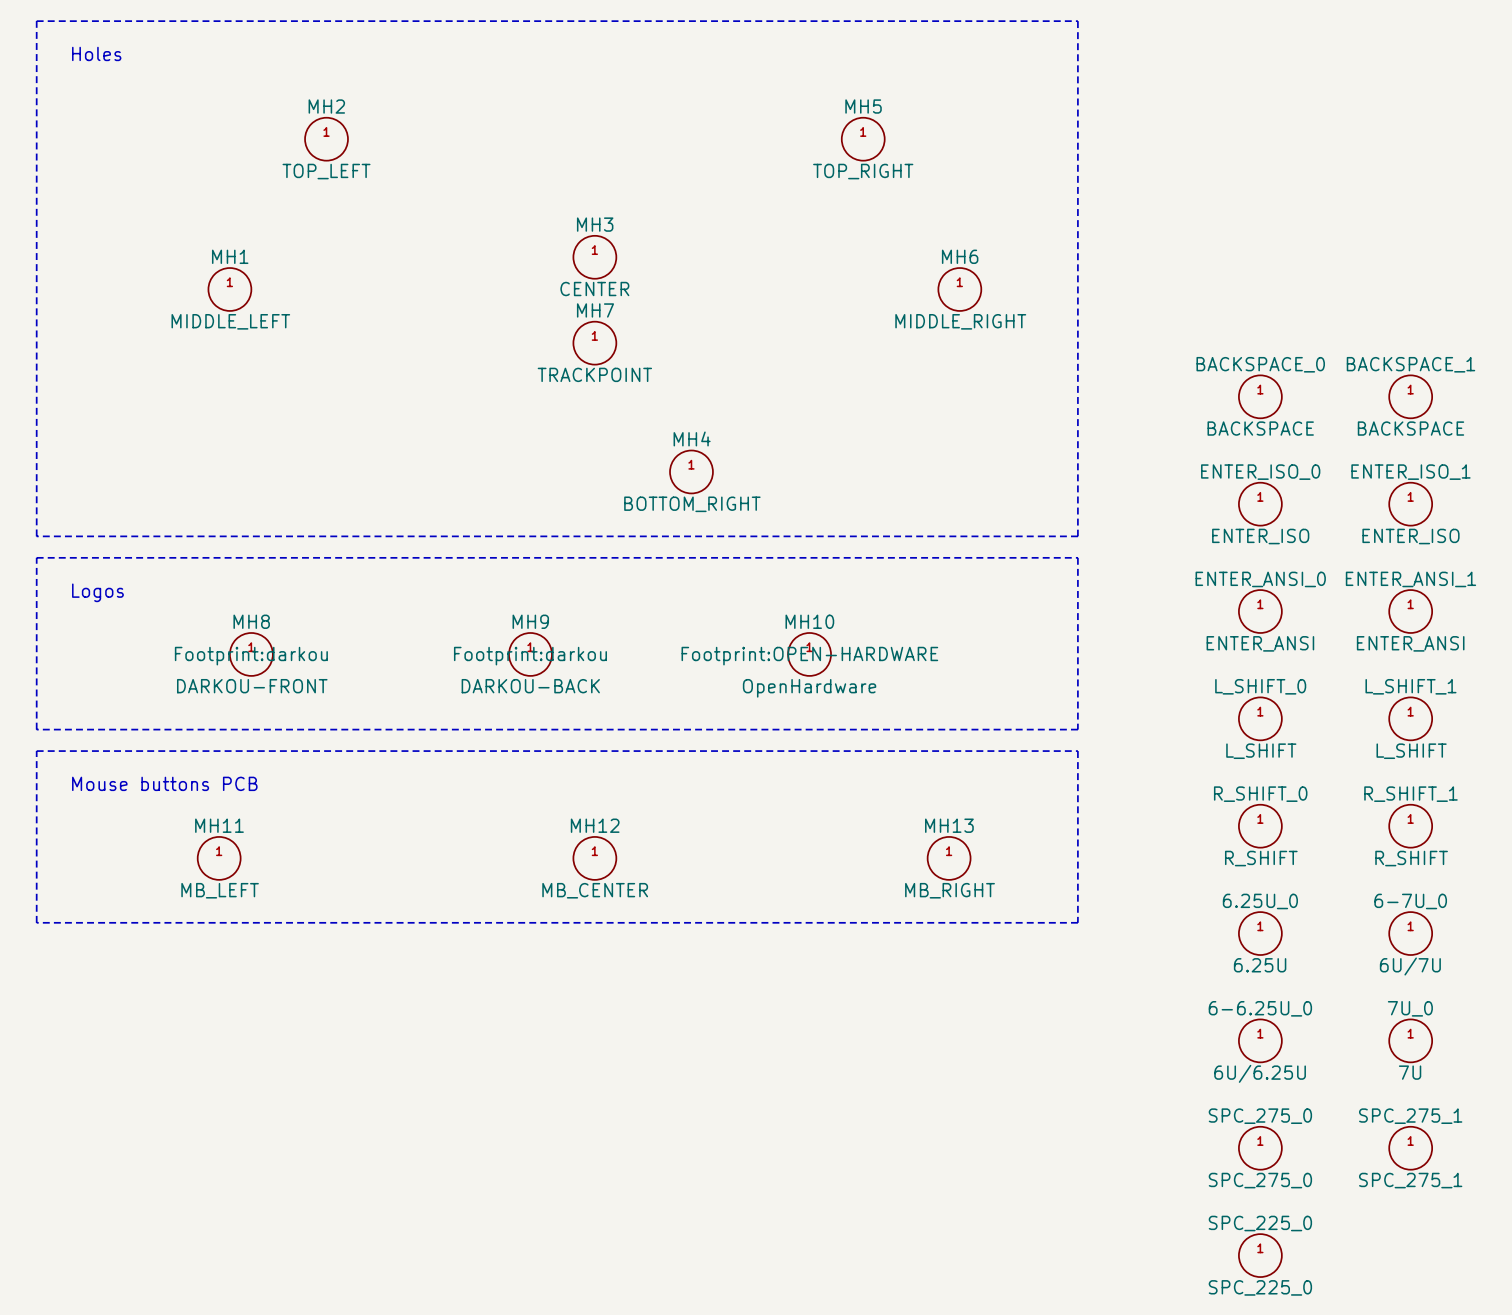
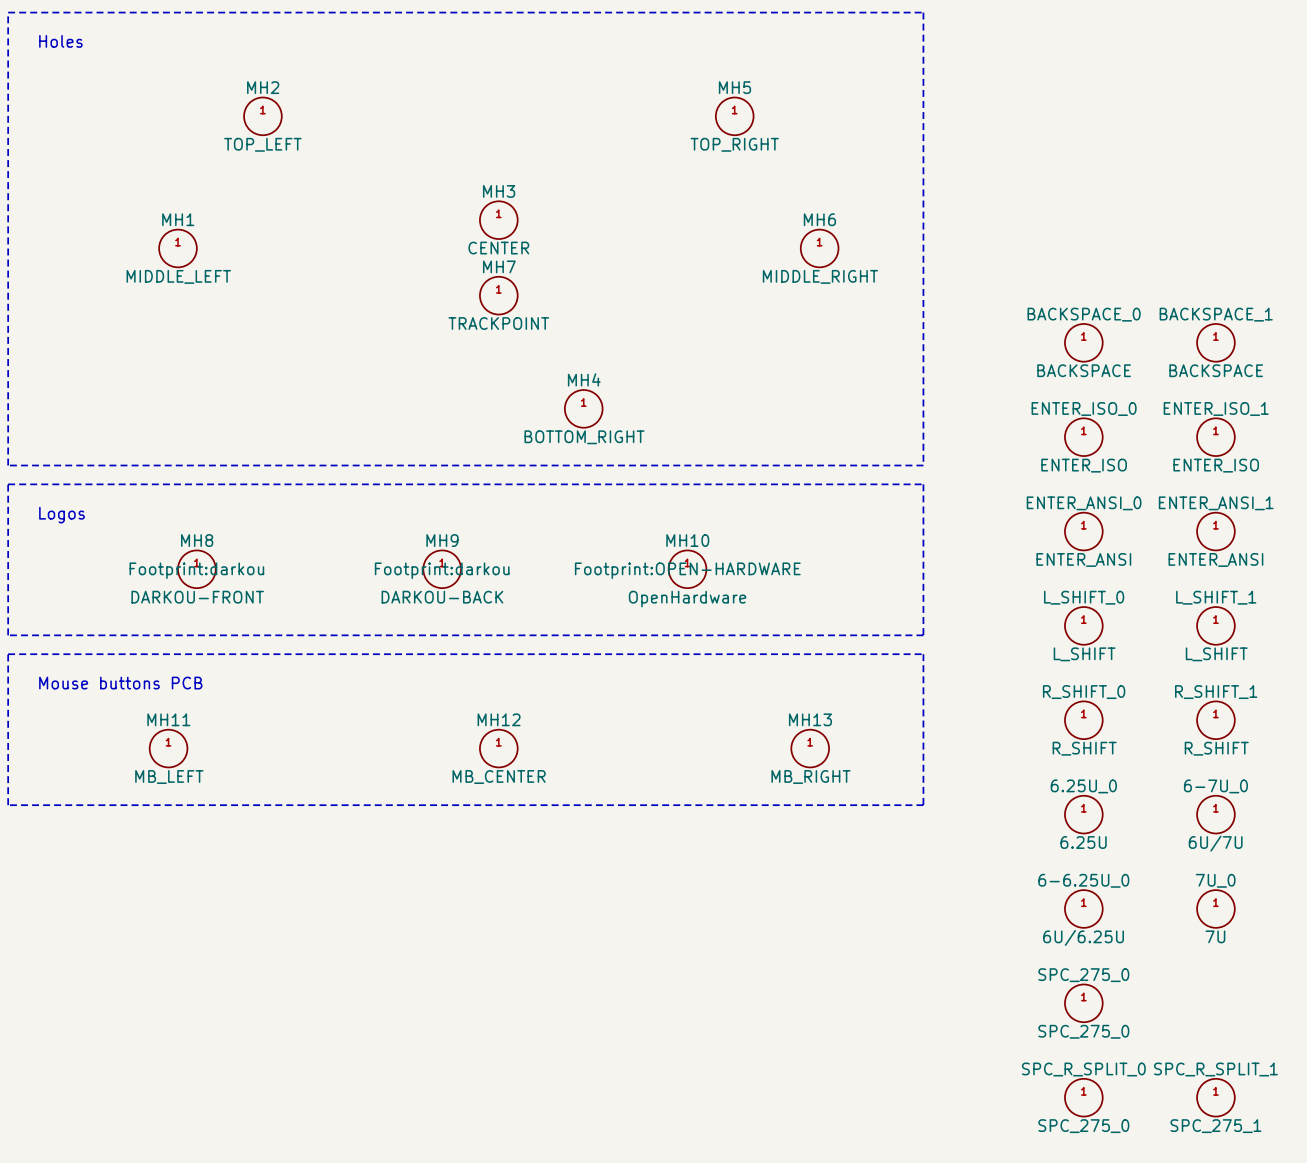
SPC_275_1: SPC_275_1 (1410, 1148) -> none
SPC_225_0 name: SPC_225_0 (1260, 1223) -> SPC_R_SPLIT_0 (1083, 1069)
SPC_R_SPLIT_1: none -> SPC_275_1 (1215, 1097)
SPC_225_0 value: SPC_225_0 (1260, 1287) -> SPC_275_0 (1083, 1126)

